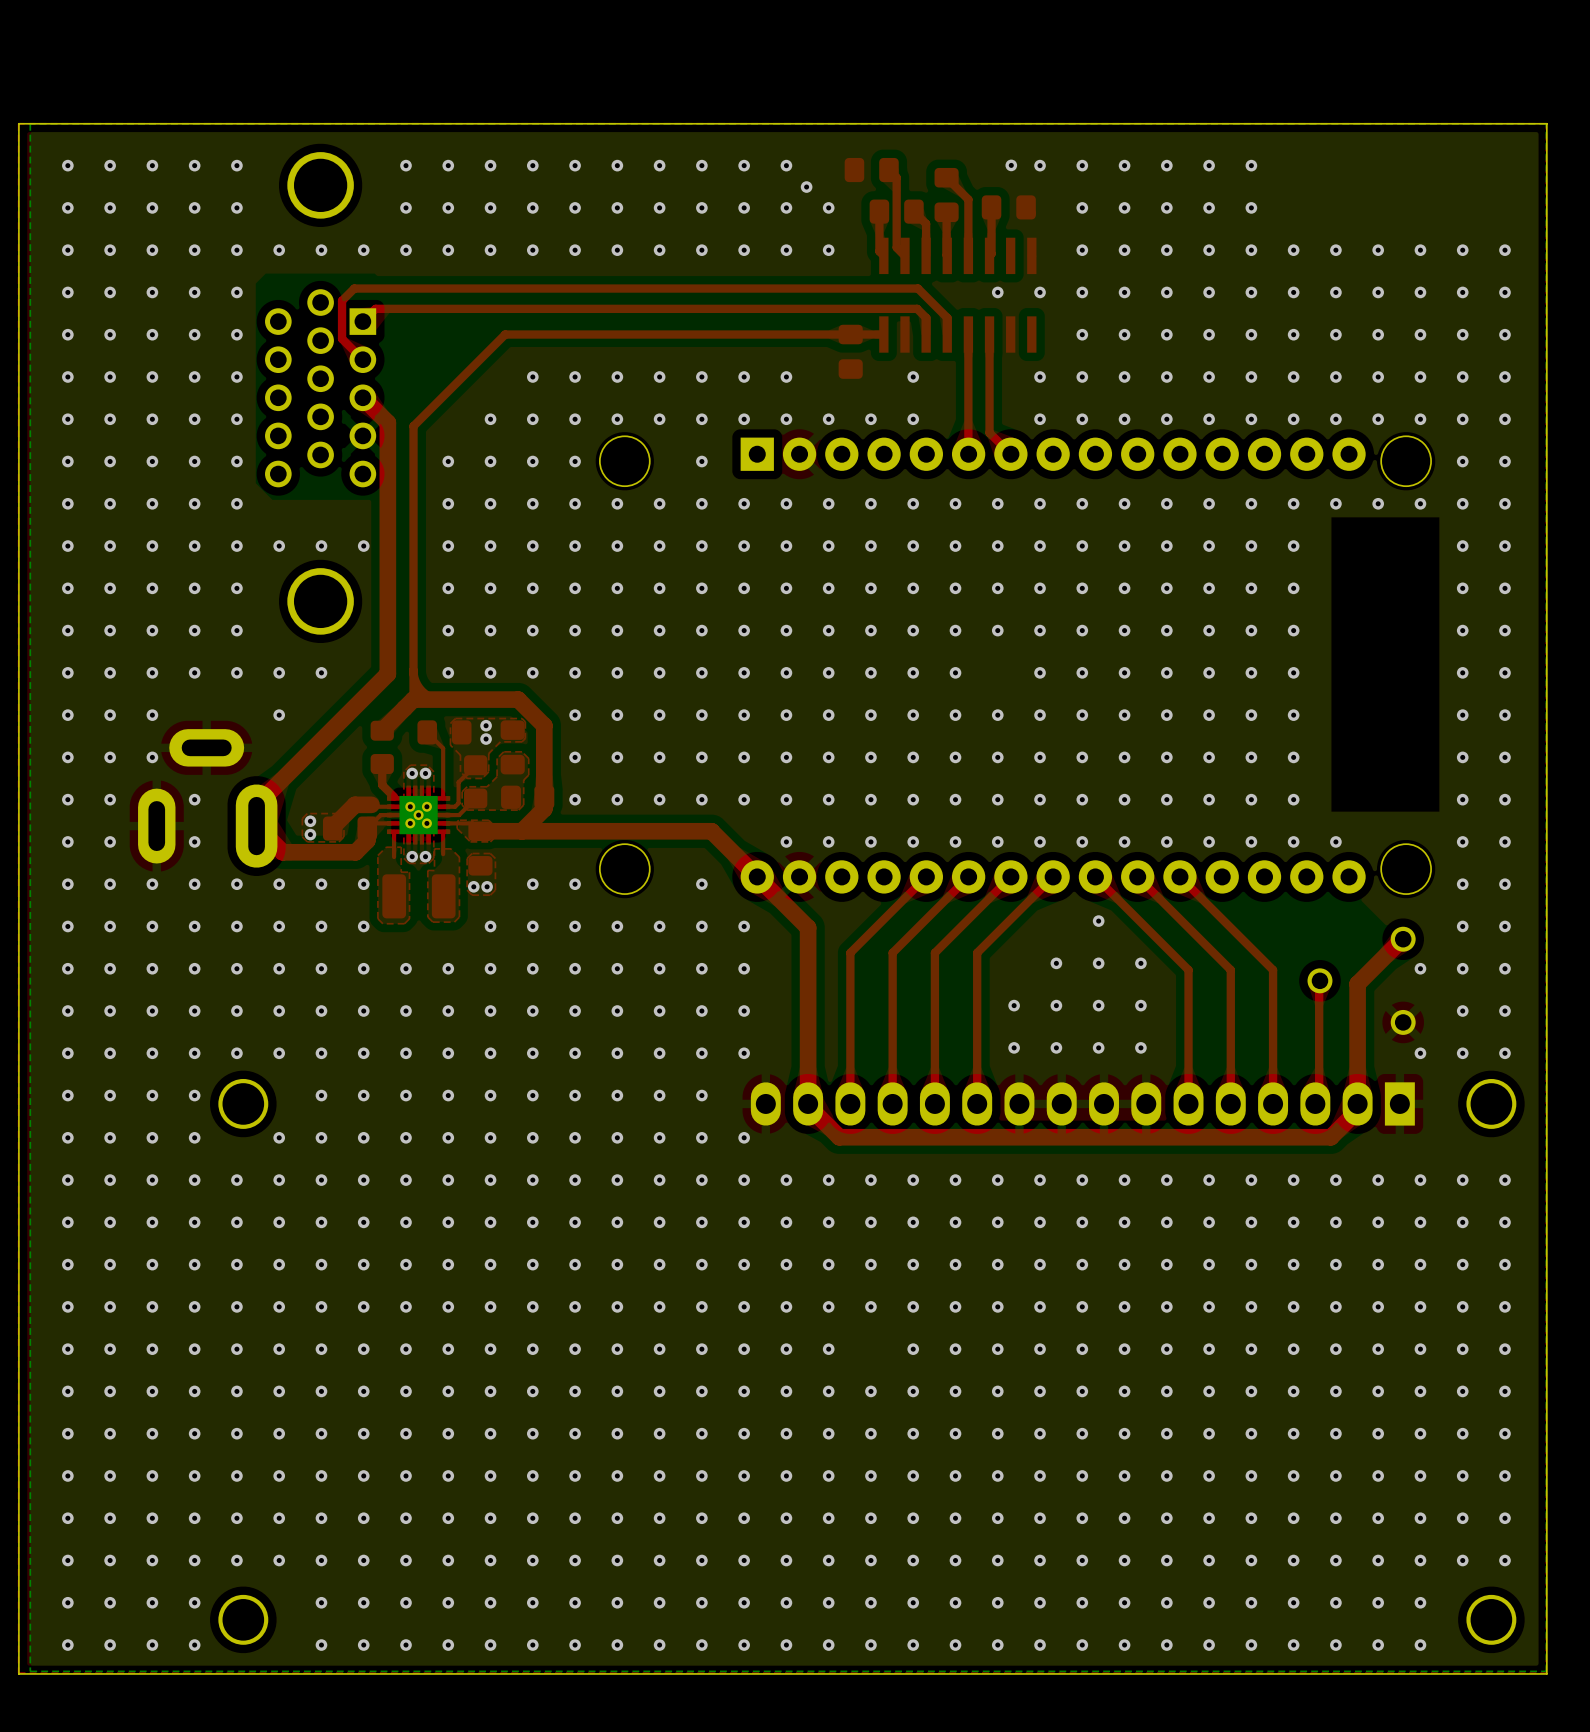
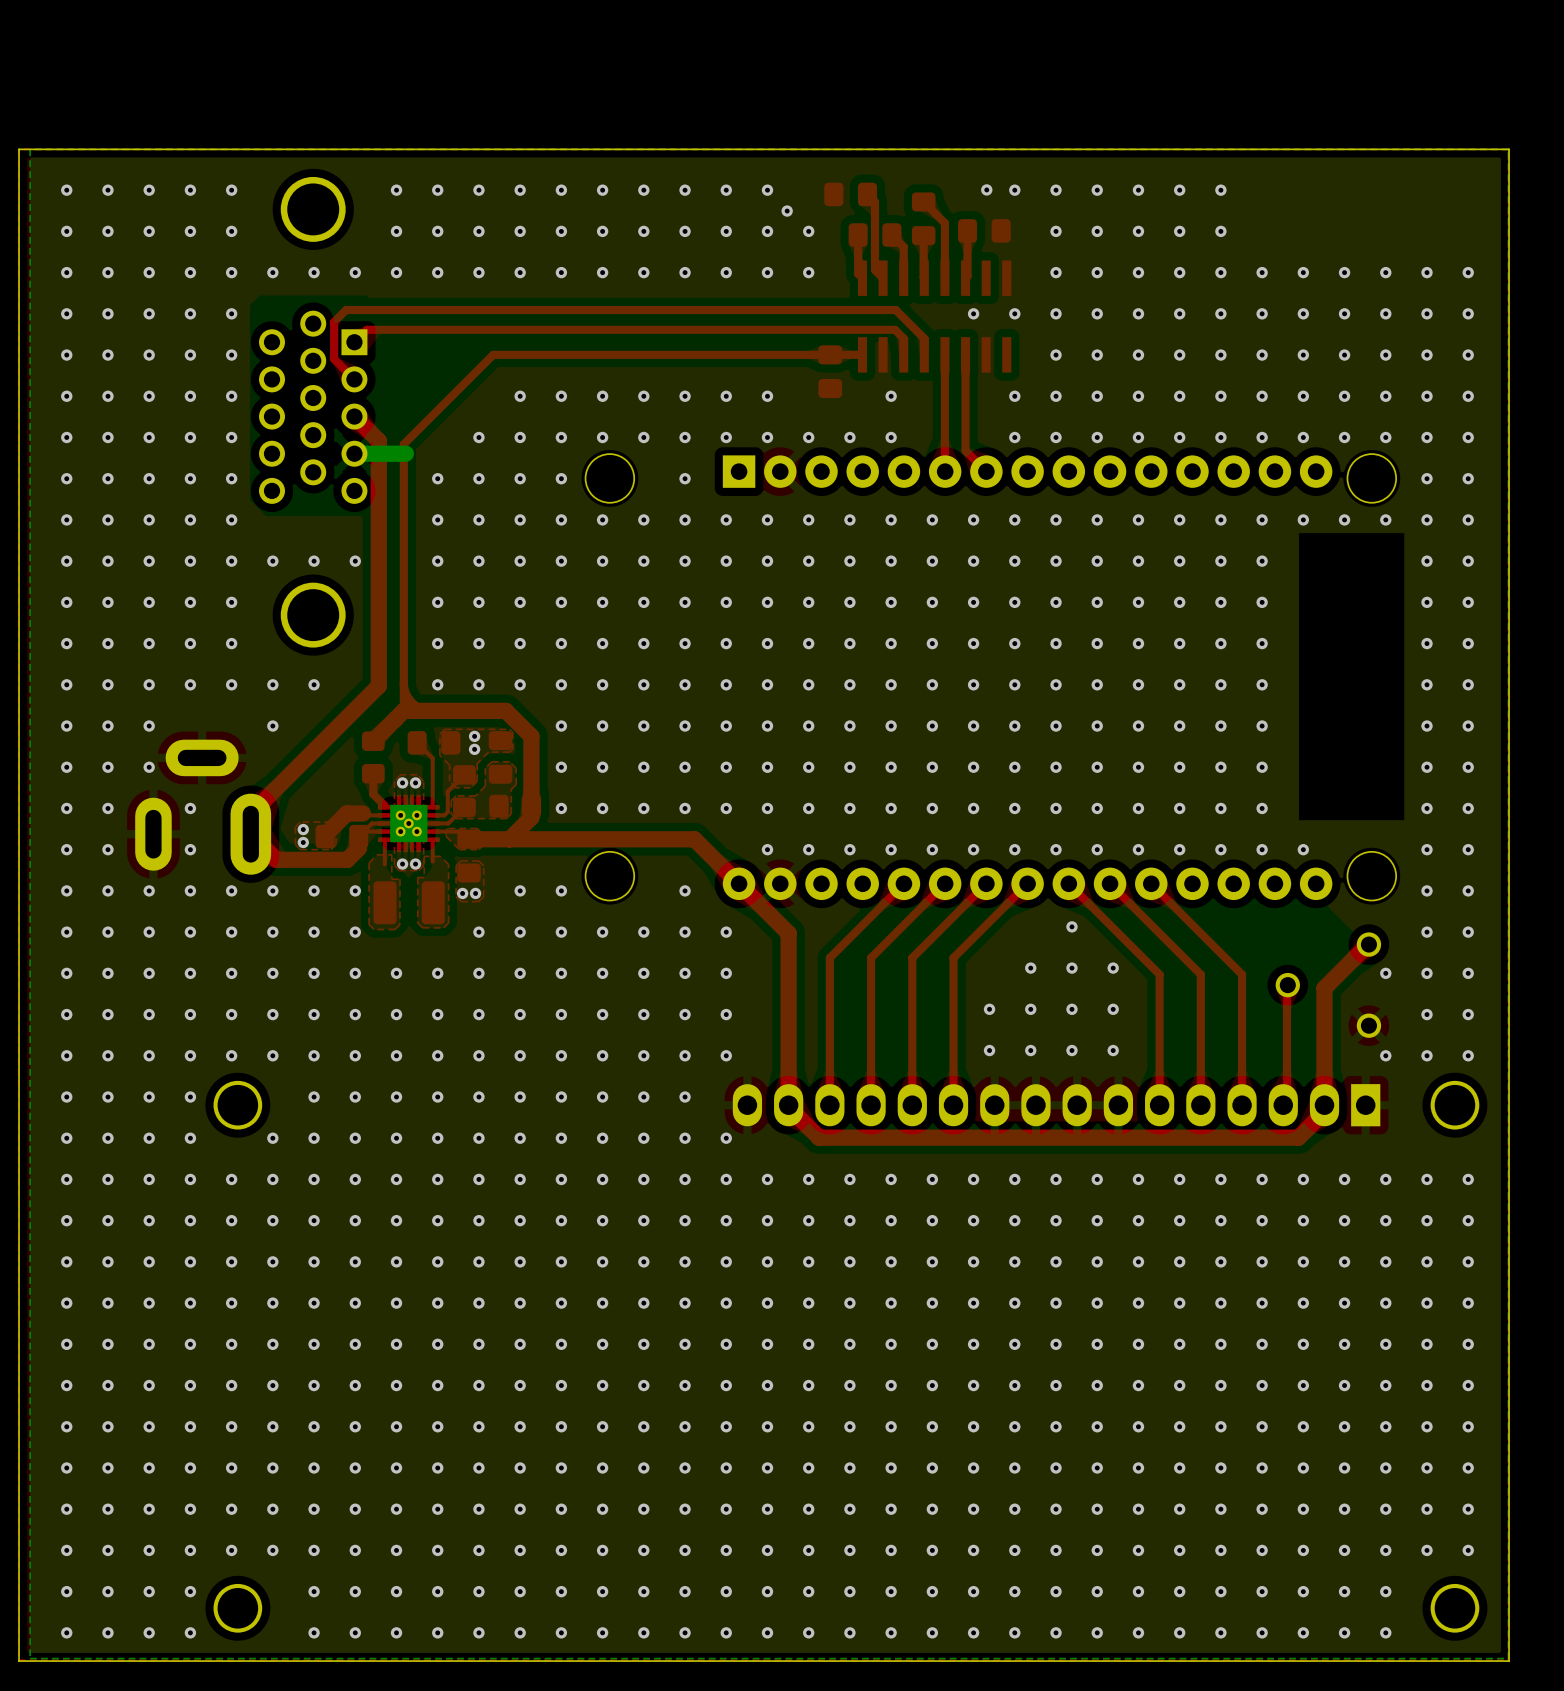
bottom track: none -> (405, 453) (354, 453)
via: none -> (973, 684)
via: none -> (849, 1344)

